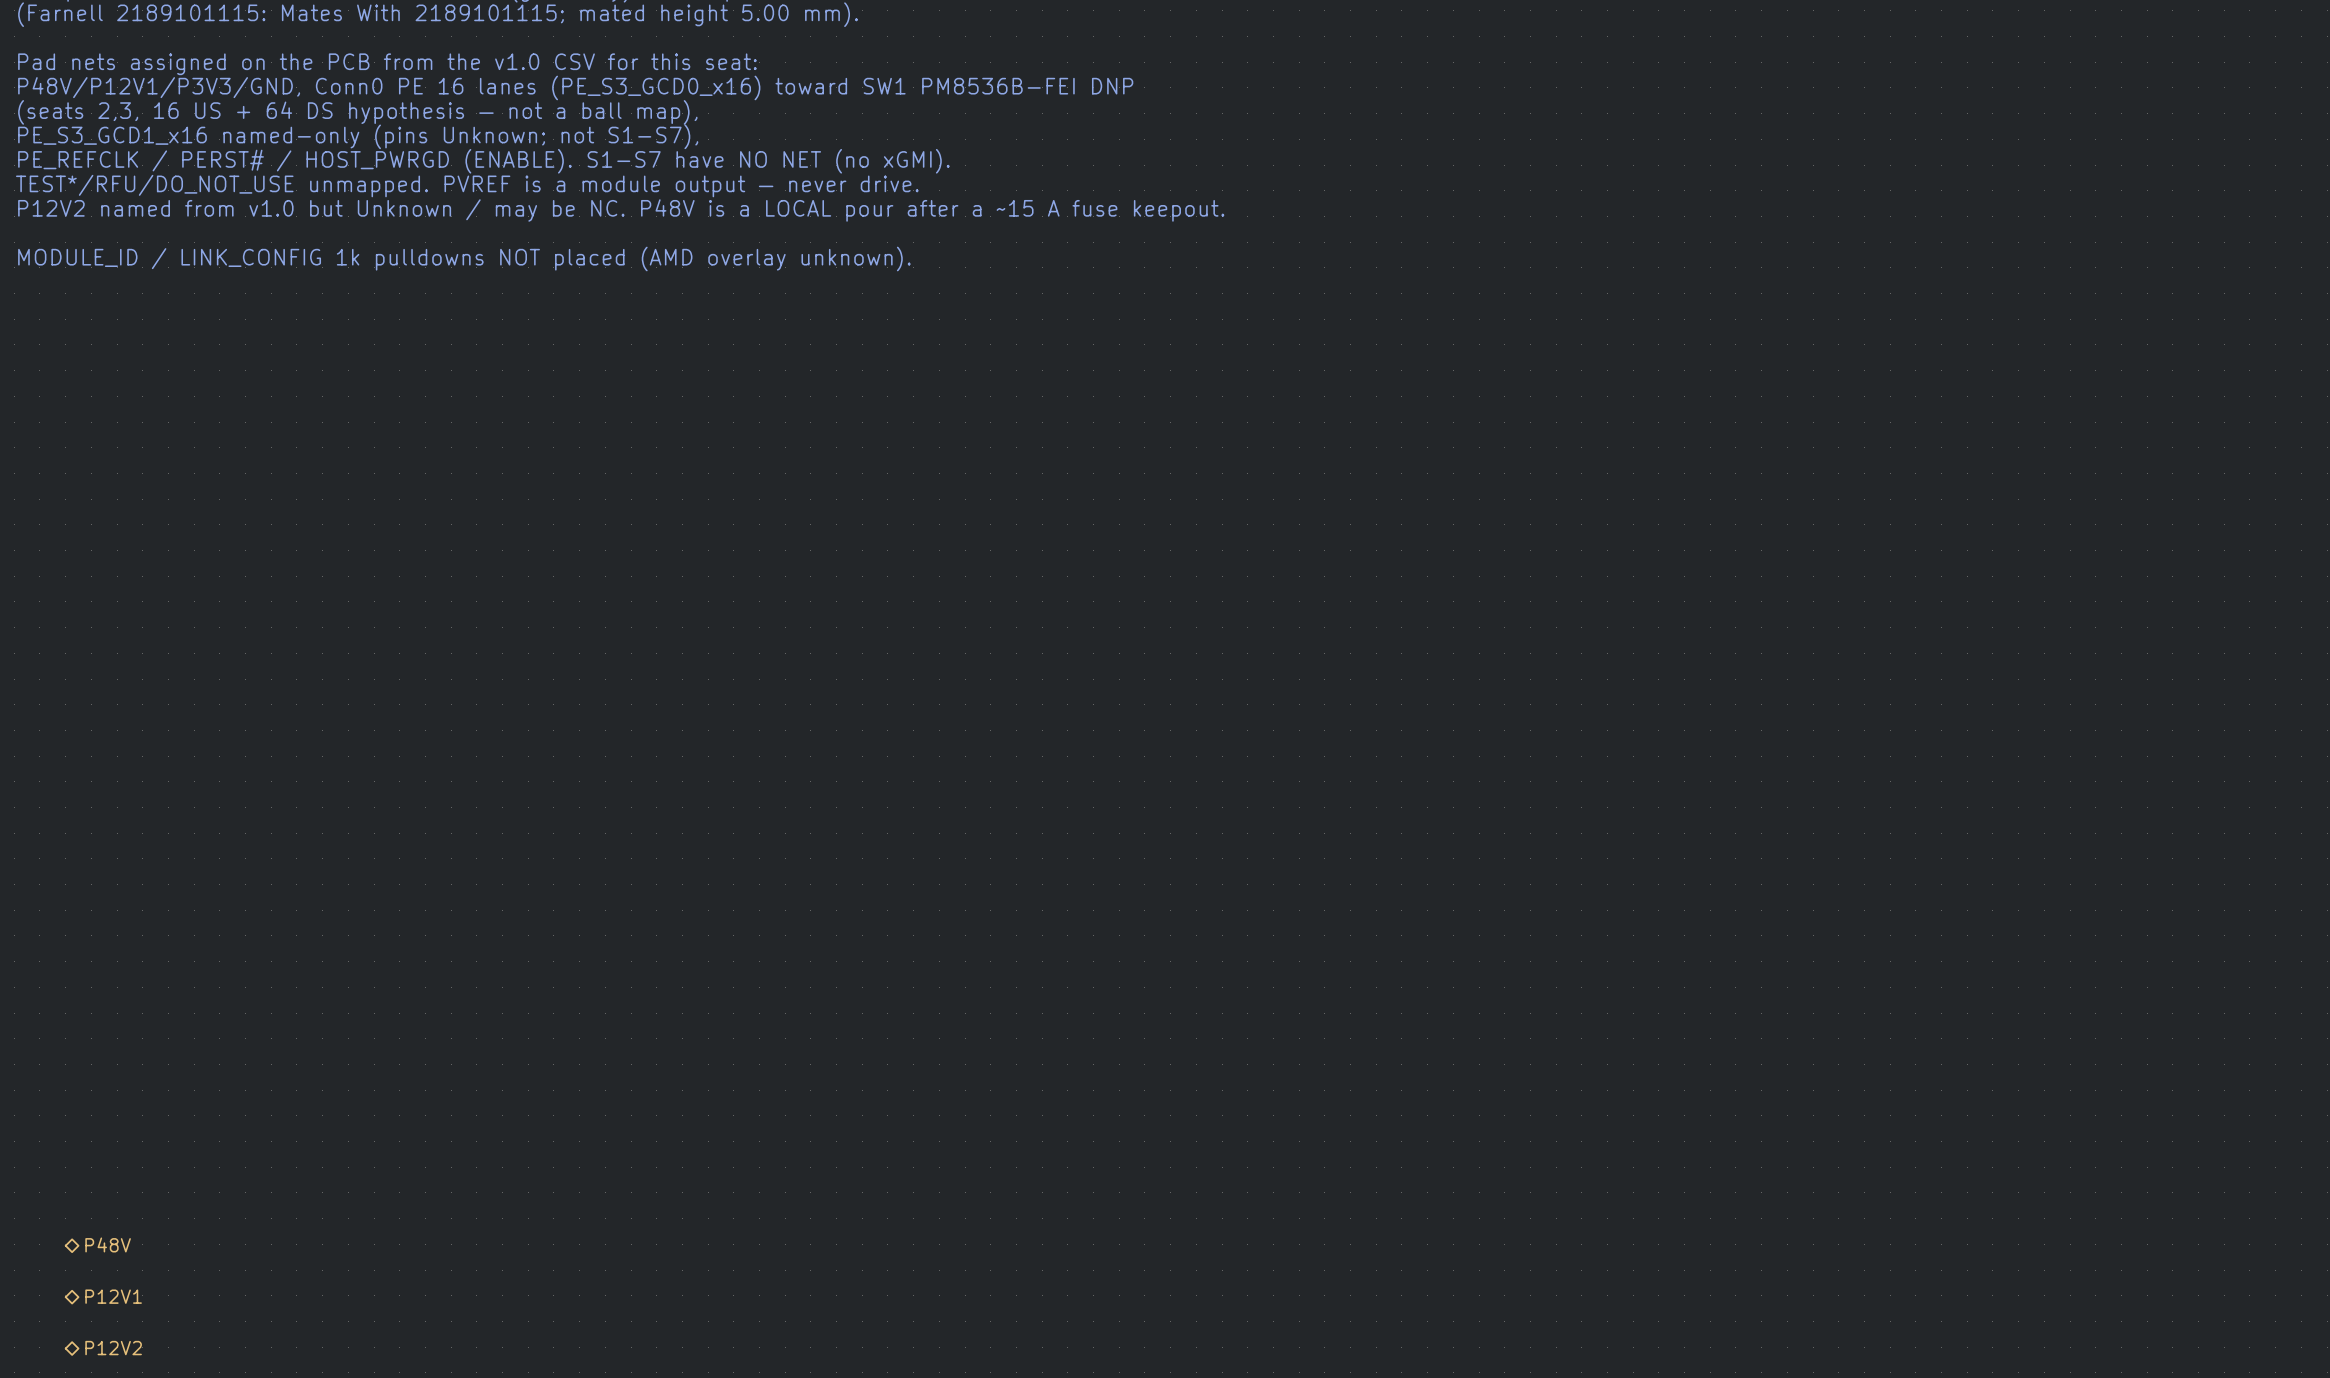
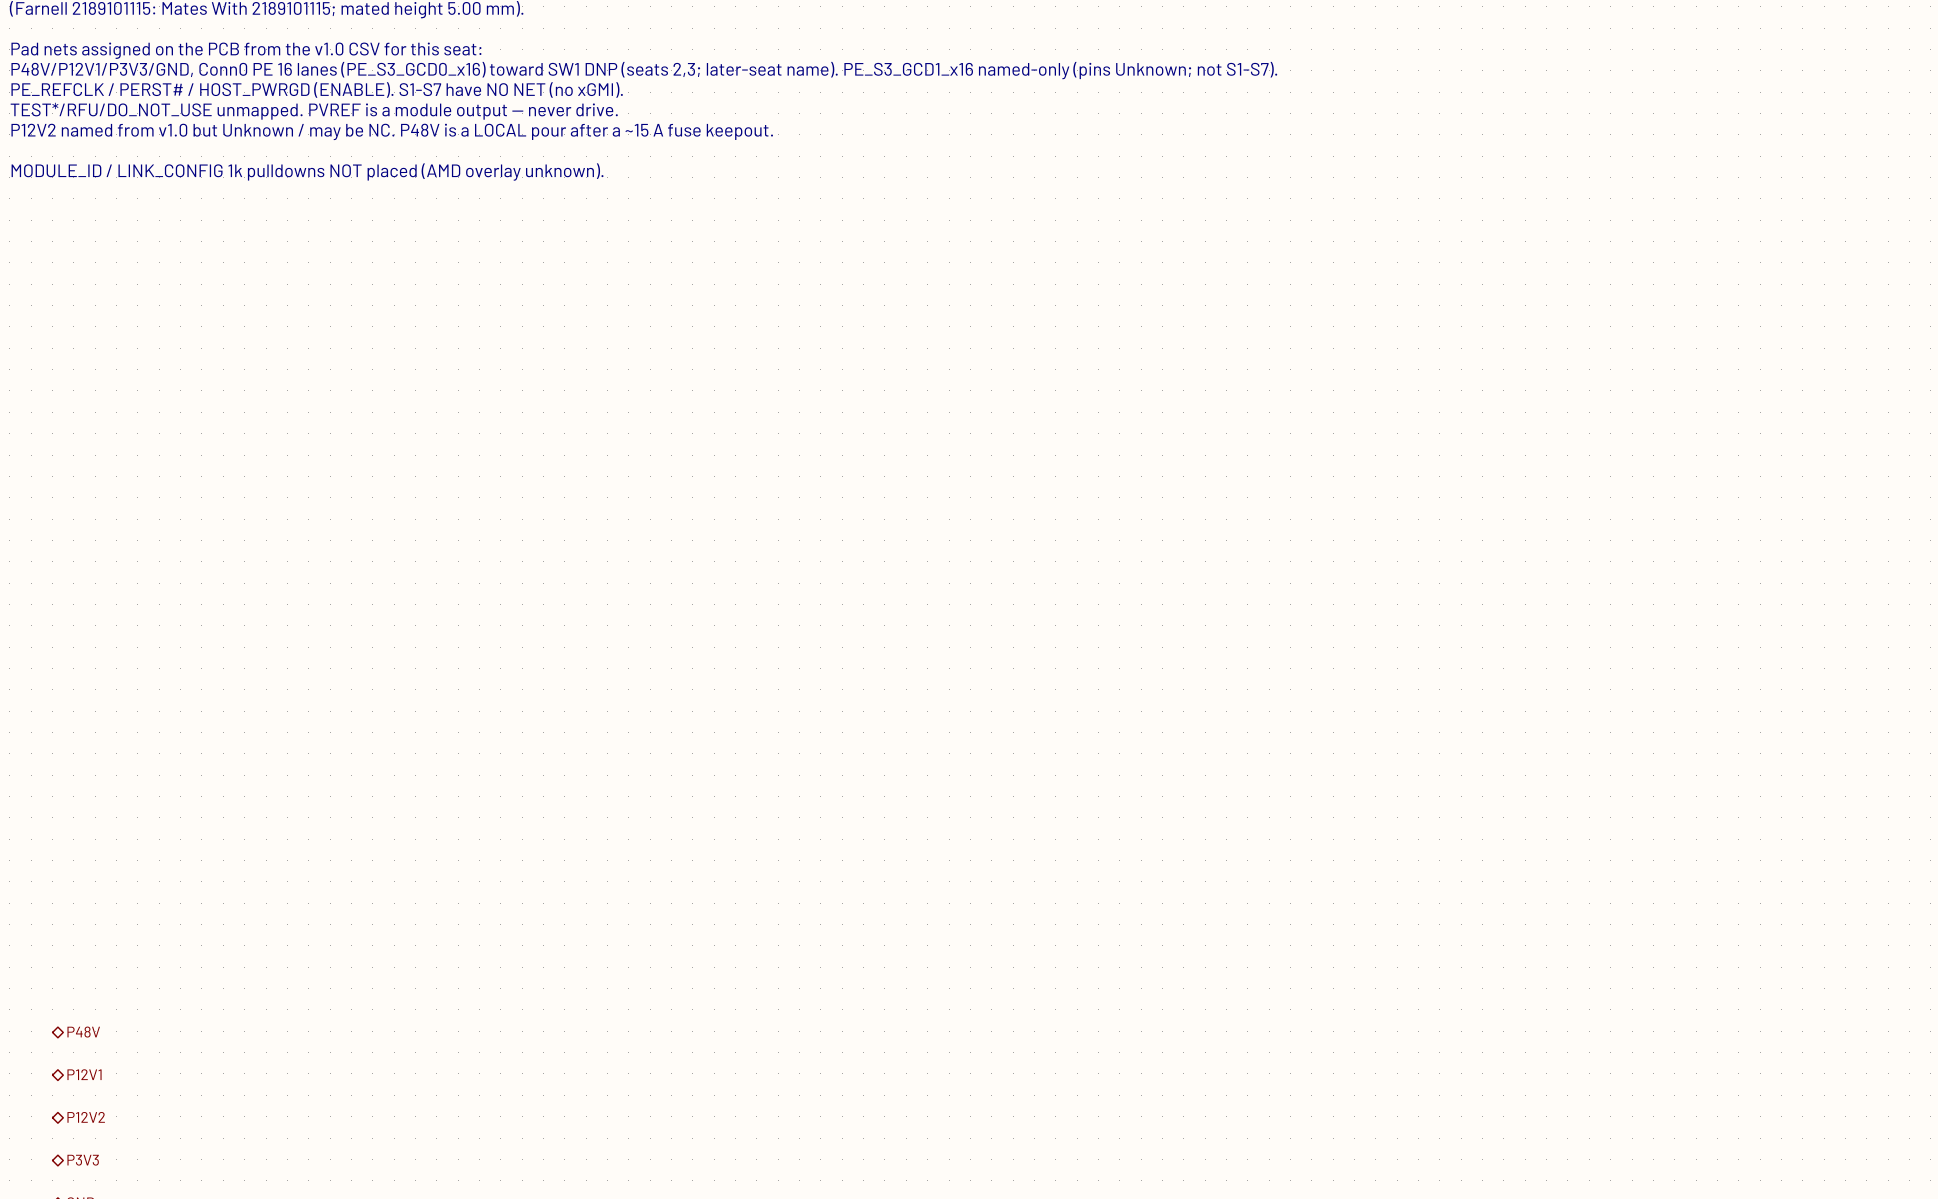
text: P48V/P12V1/P3V3/GND, Conn0 PE 16 lanes (PE_S3_GCD0_x16) toward SW1 PM8536B-FEI DNP (575, 87) -> P48V/P12V1/P3V3/GND, Conn0 PE 16 lanes (PE_S3_GCD0_x16) toward SW1 DNP (seats 2,3; later-seat name). PE_S3_GCD1_x16 named-only (pins Unknown; not S1-S7). (644, 70)
text: (seats 2,3, 16 US + 64 DS hypothesis — not a ball map), (357, 112) -> PE_REFCLK / PERST# / HOST_PWRGD (ENABLE). S1-S7 have NO NET (no xGMI). (317, 89)
text: PE_S3_GCD1_x16 named-only (pins Unknown; not S1-S7), (358, 136) -> TEST*/RFU/DO_NOT_USE unmapped. PVREF is a module output — never drive. (314, 111)
text: PE_REFCLK / PERST# / HOST_PWRGD (ENABLE). S1-S7 have NO NET (no xGMI). (483, 161) -> P12V2 named from v1.0 but Unknown / may be NC. P48V is a LOCAL pour after a ~15 A fuse keepout. (392, 131)
text: TEST*/RFU/DO_NOT_USE unmapped. PVREF is a module output — never drive. (467, 186) -> none
text: P12V2 named from v1.0 but Unknown / may be NC. P48V is a LOCAL pour after a ~15 A fuse keepout. (621, 210) -> MODULE_ID / LINK_CONFIG 1k pulldowns NOT placed (AMD overlay unknown). (307, 172)
text: MODULE_ID / LINK_CONFIG 1k pulldowns NOT placed (AMD overlay unknown). (464, 259) -> none

